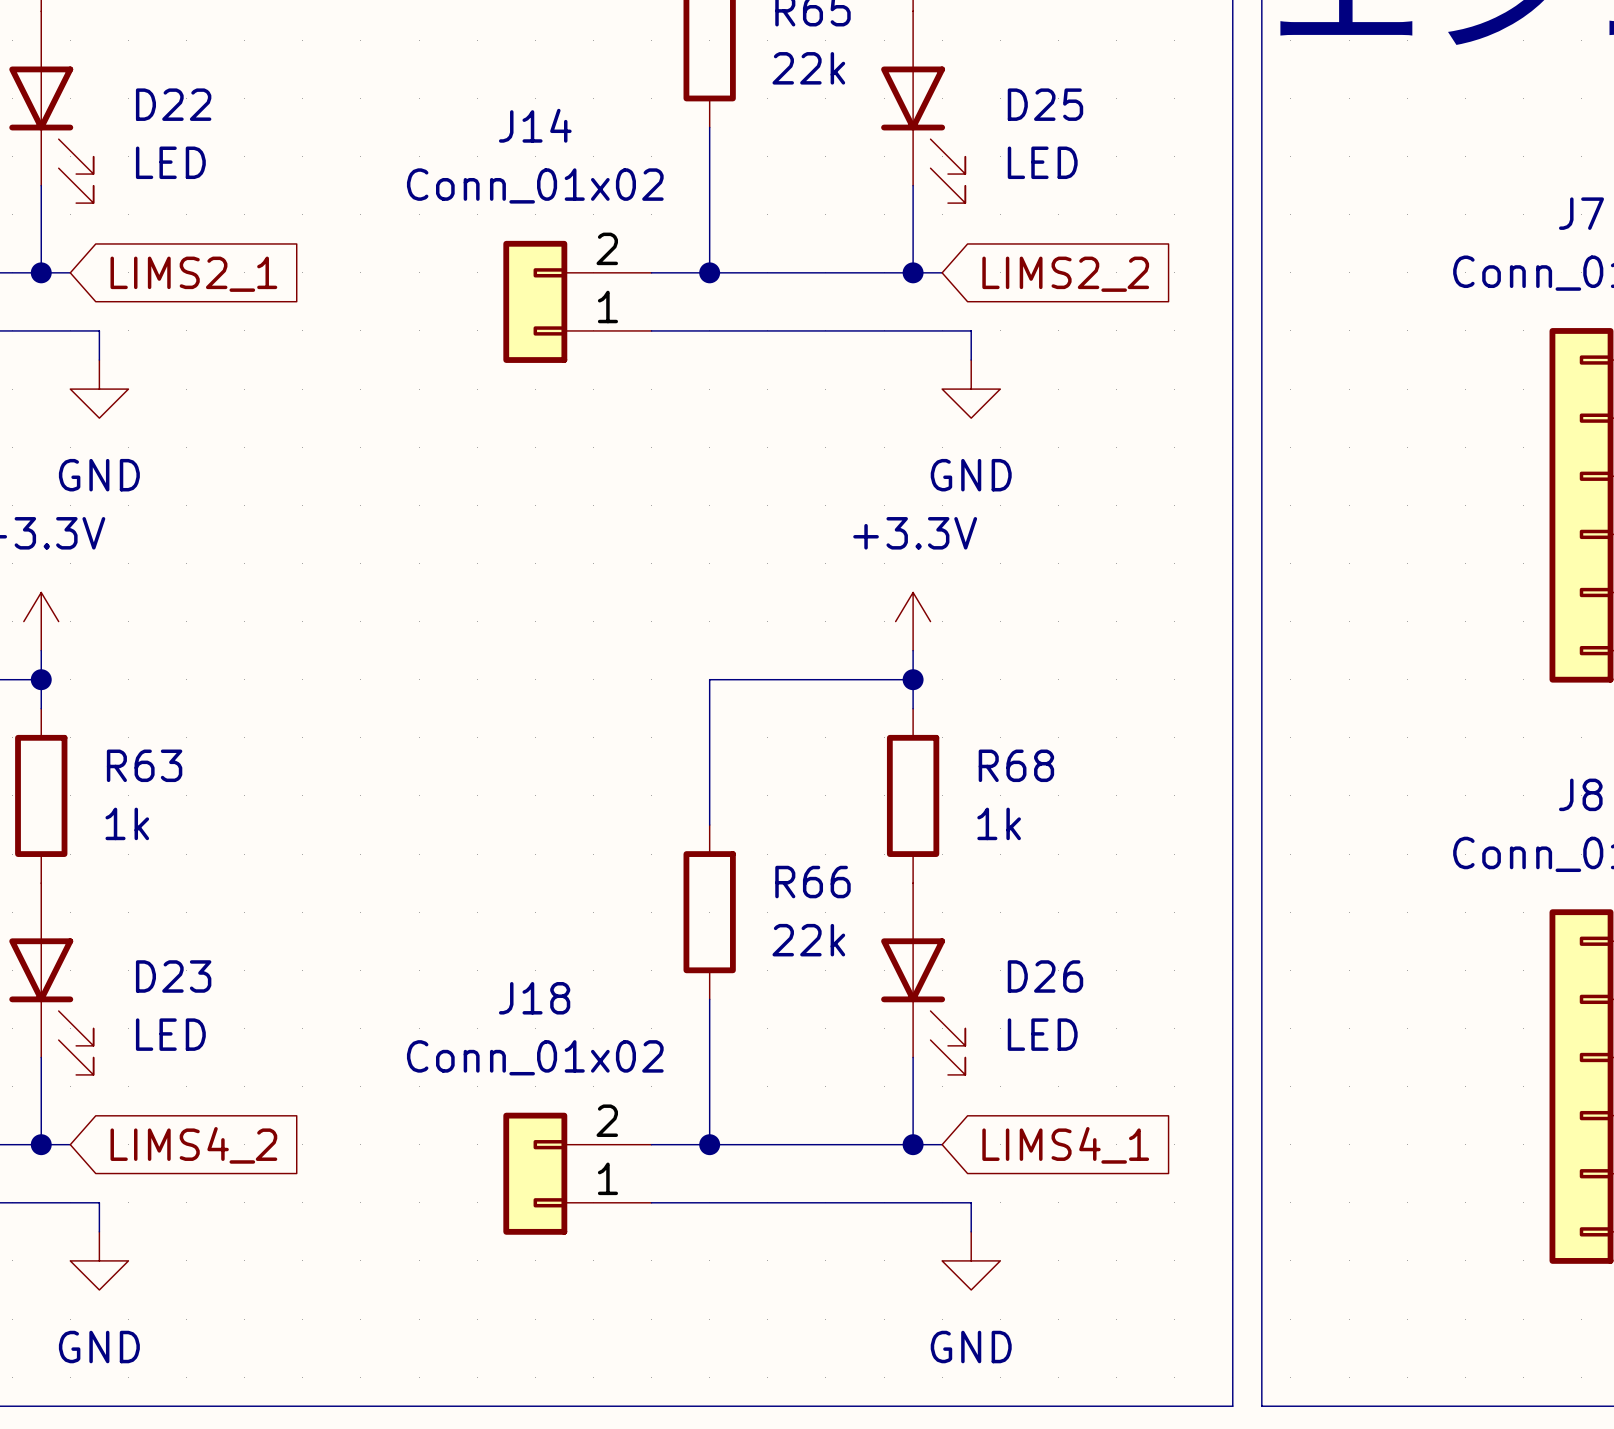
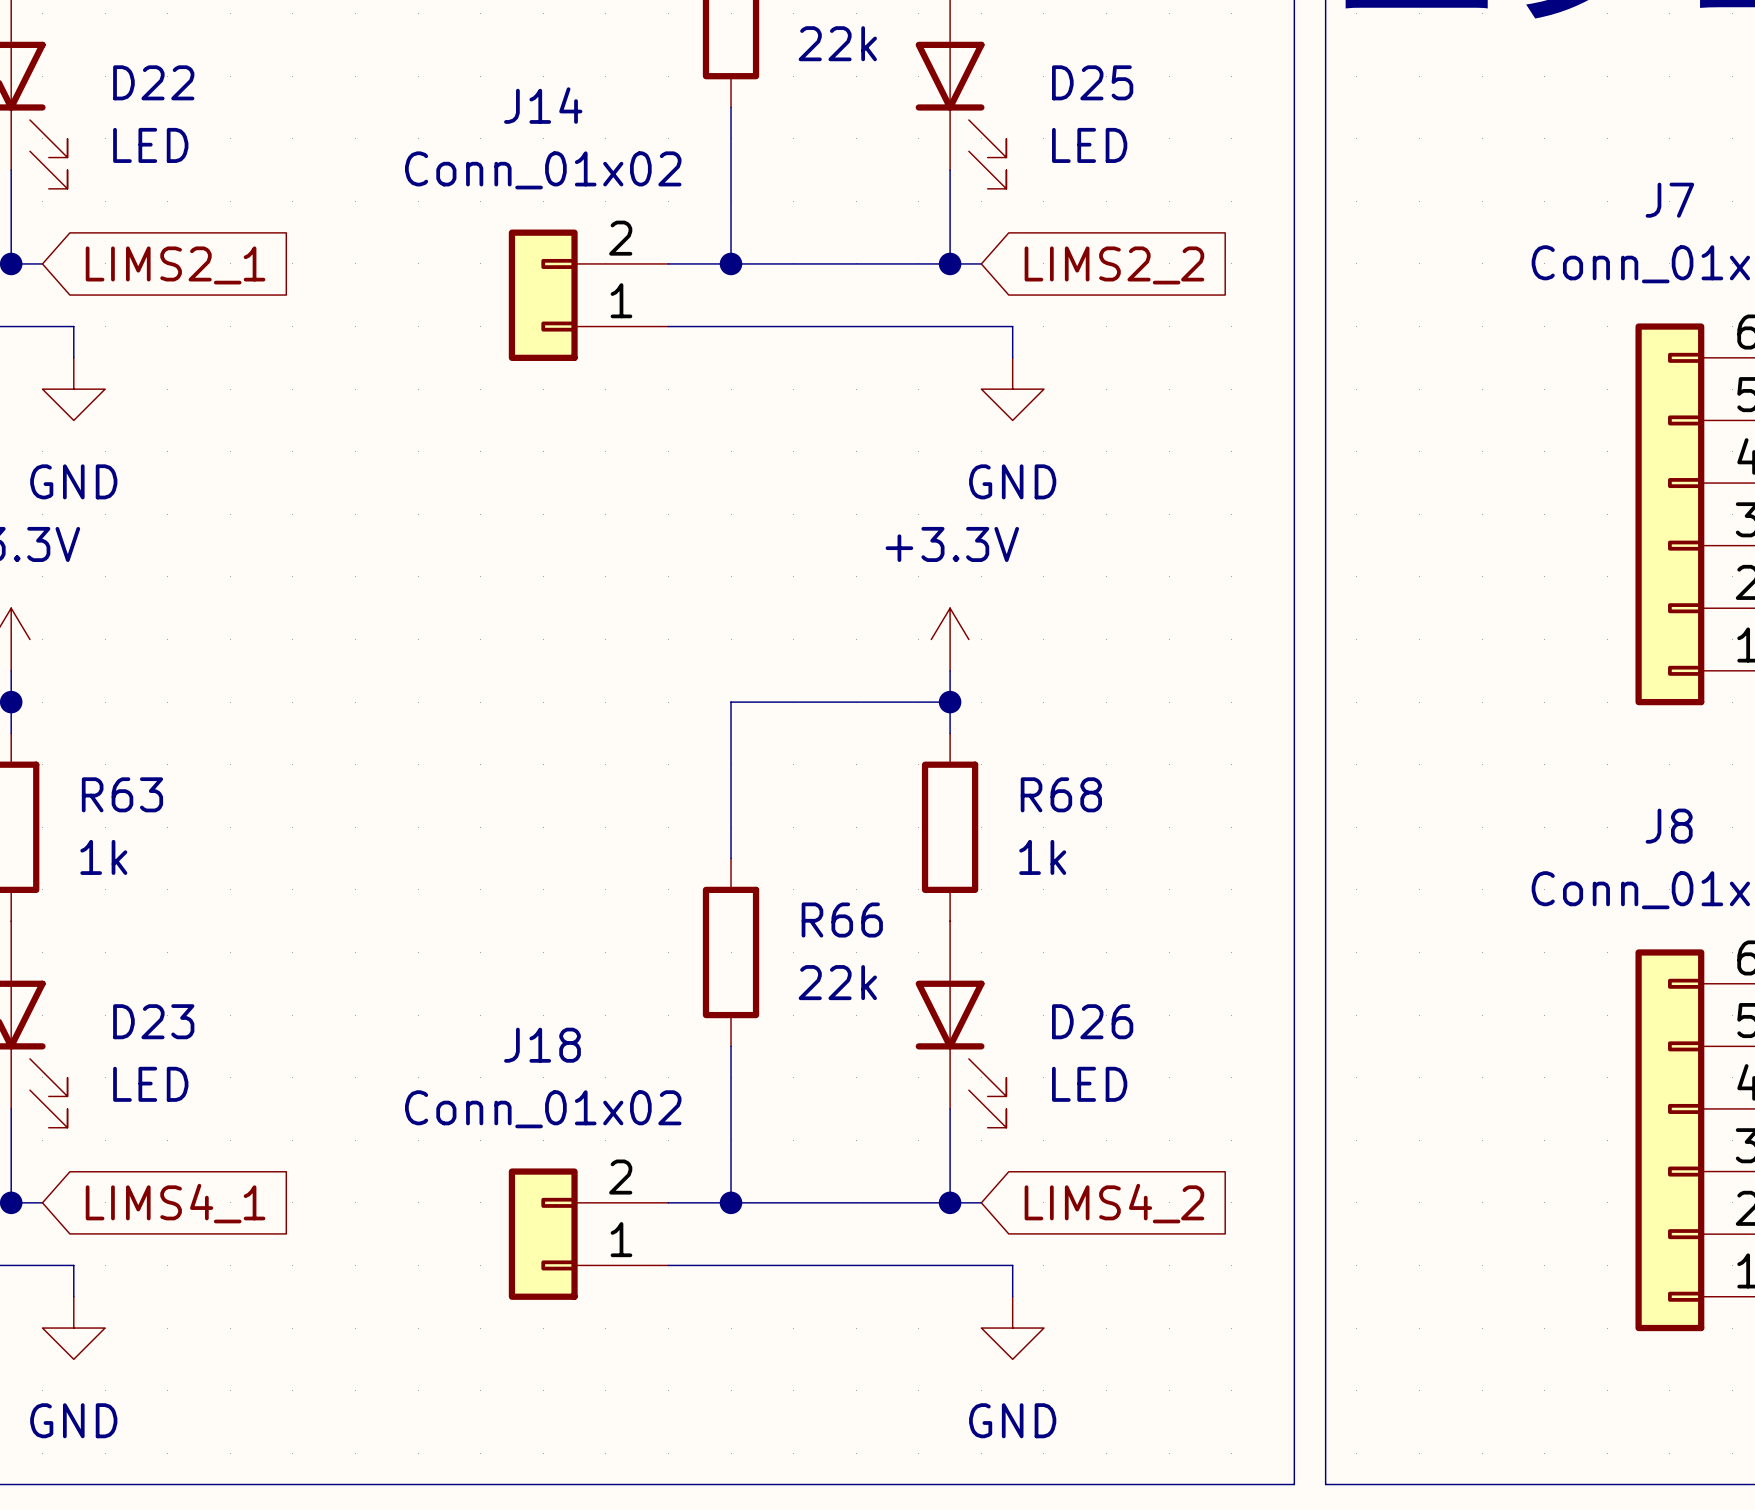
global label: LIMS4_2 (193, 1145) -> LIMS4_1 (175, 1203)
global label: LIMS4_1 (1065, 1145) -> LIMS4_2 (1114, 1203)

